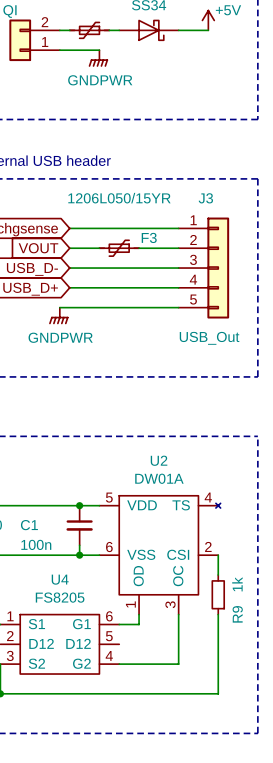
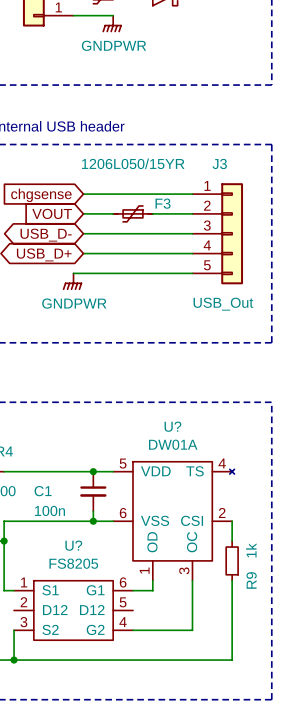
U2 name: U2 (159, 460) -> U? (172, 426)
U4 name: U4 (60, 579) -> U? (73, 545)

